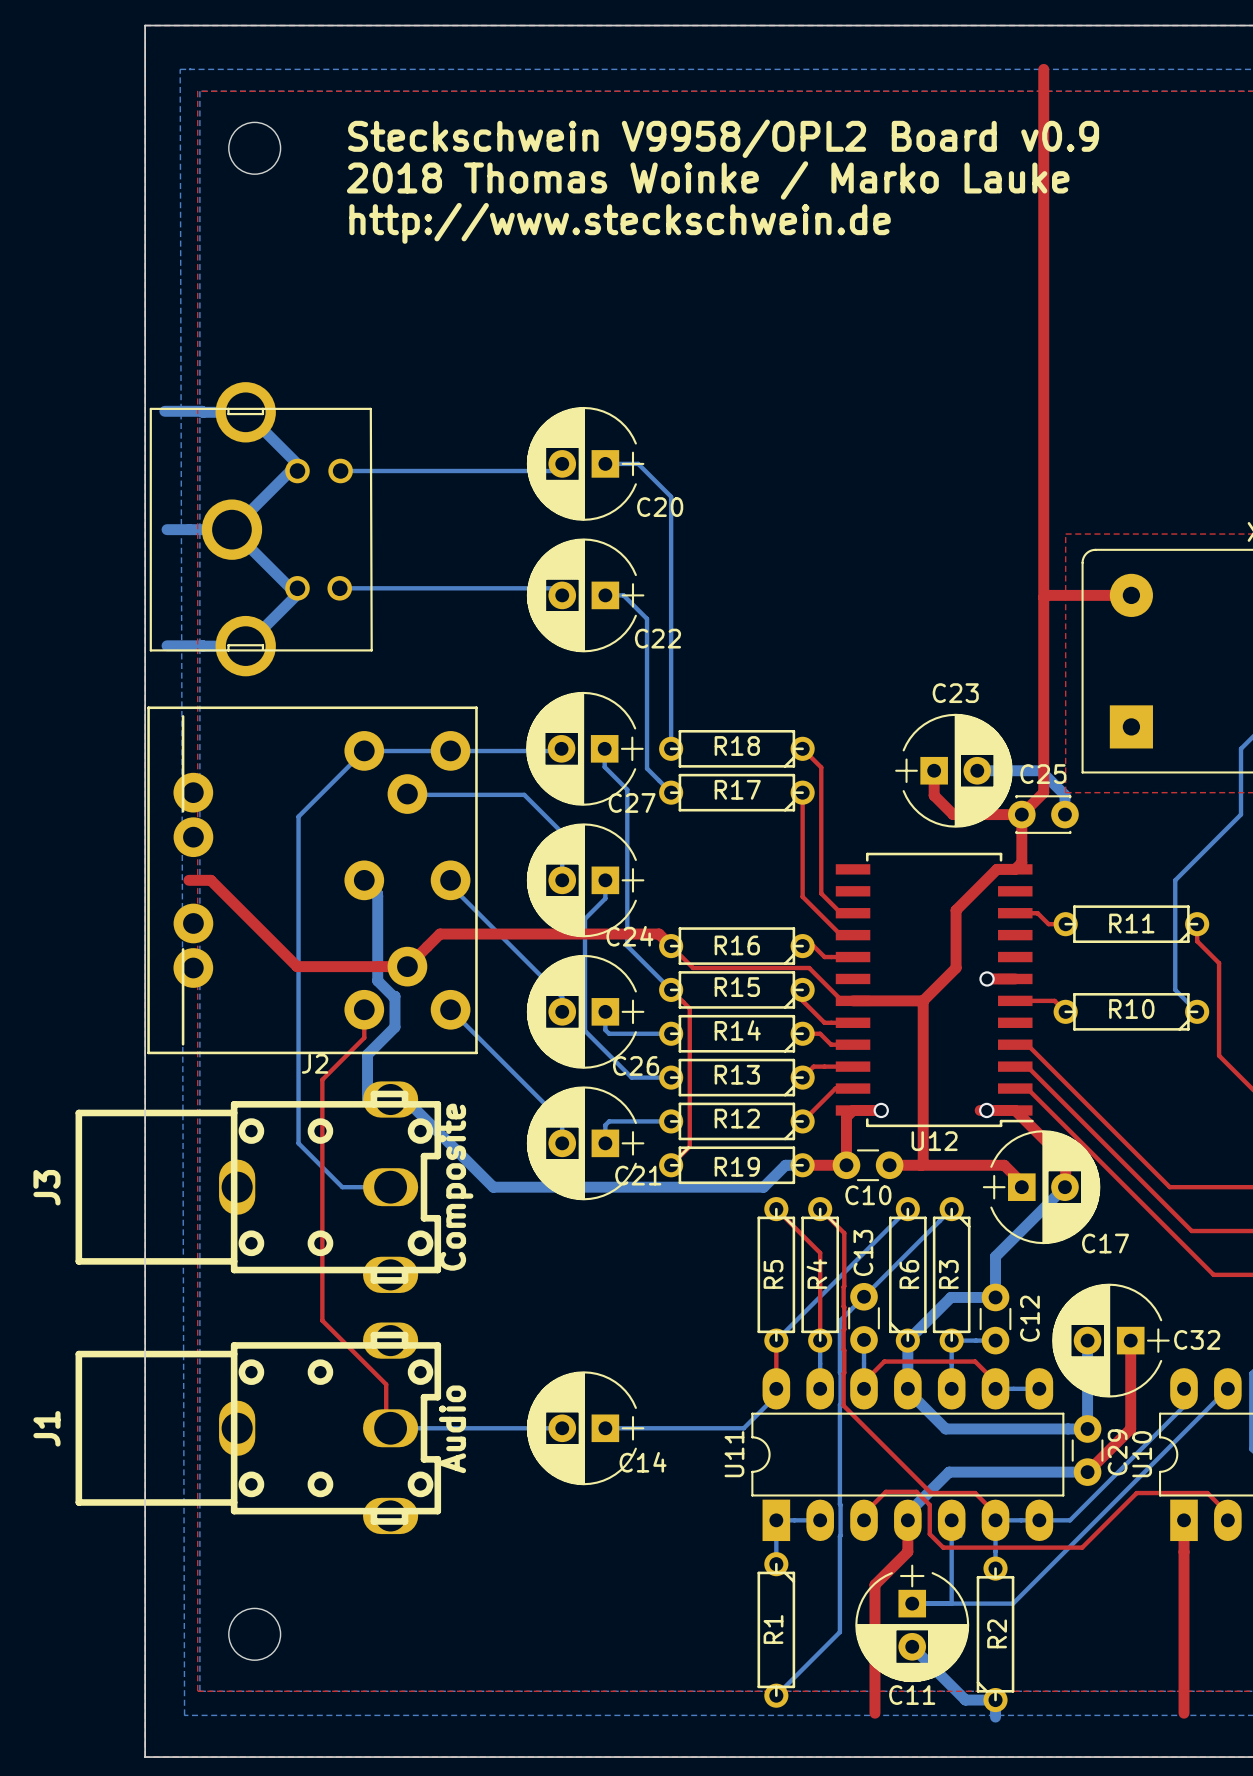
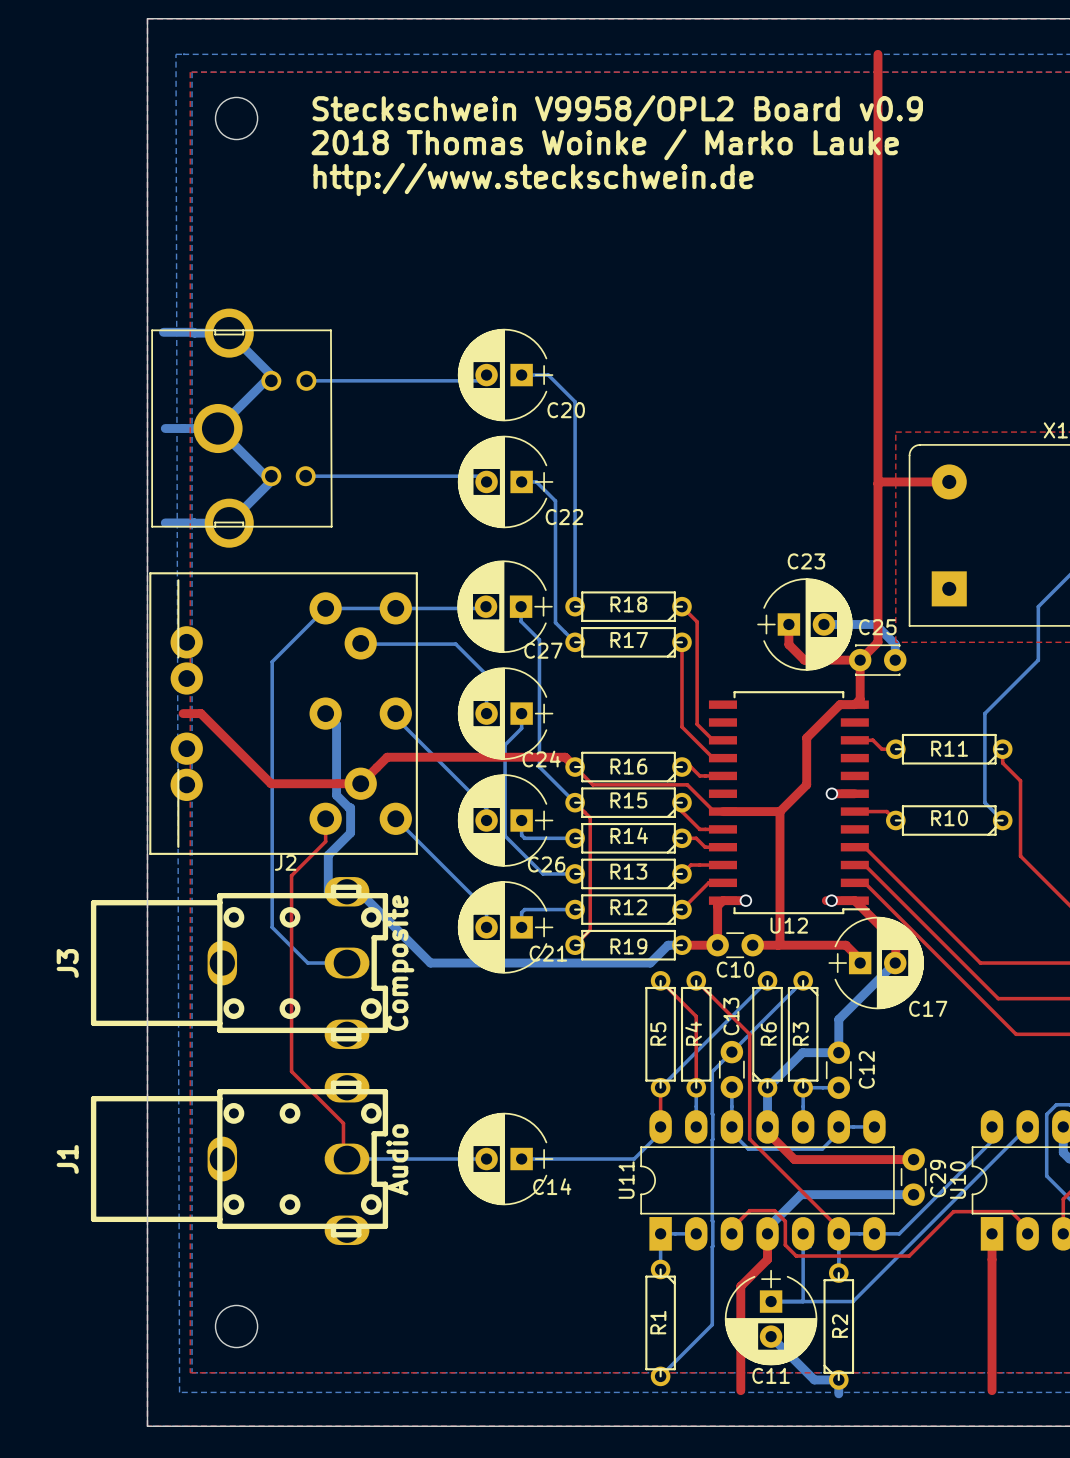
top track: (844, 1233) (843, 1405) (930, 1493) (975, 1493) -> (715, 1000) (749, 1034) (749, 1139) (822, 1211)
bottom track: (1087, 1340) (1087, 1428) (945, 1428) (907, 1391) (907, 1388) -> none
C32: (1110, 1340) -> none
top track: (1130, 1340) (1130, 1428) (1087, 1472) -> none
top track: (864, 1388) (864, 1381) (884, 1361) (975, 1361) (995, 1381) (995, 1388) -> none
bottom track: none -> (731, 1132) (748, 1149) (822, 1149) (838, 1132)
top track: none -> (767, 1132) (794, 1159) (913, 1159)

